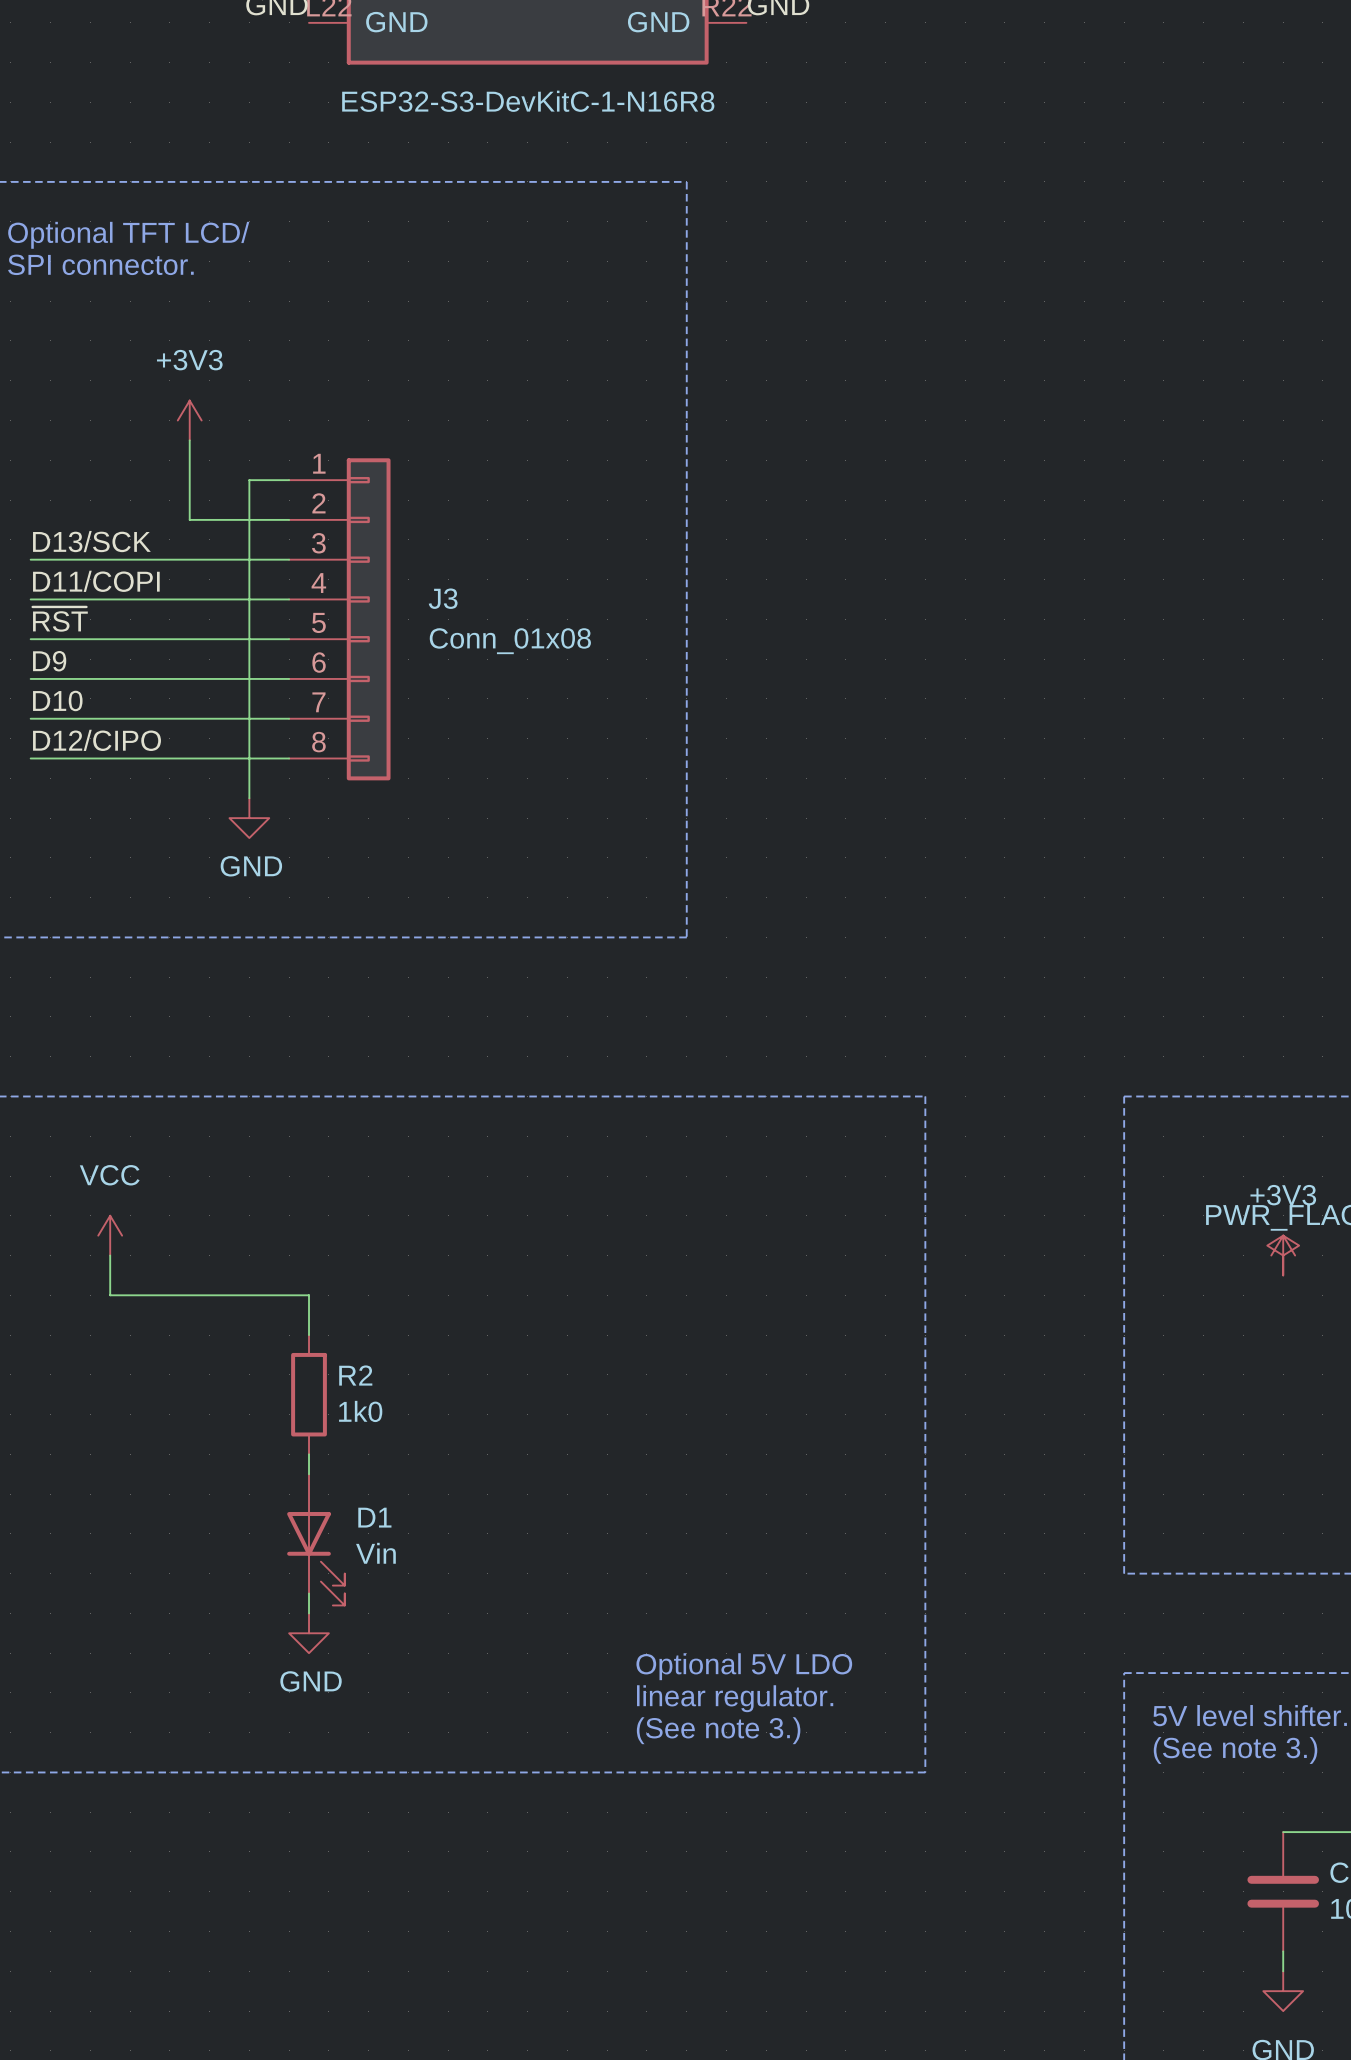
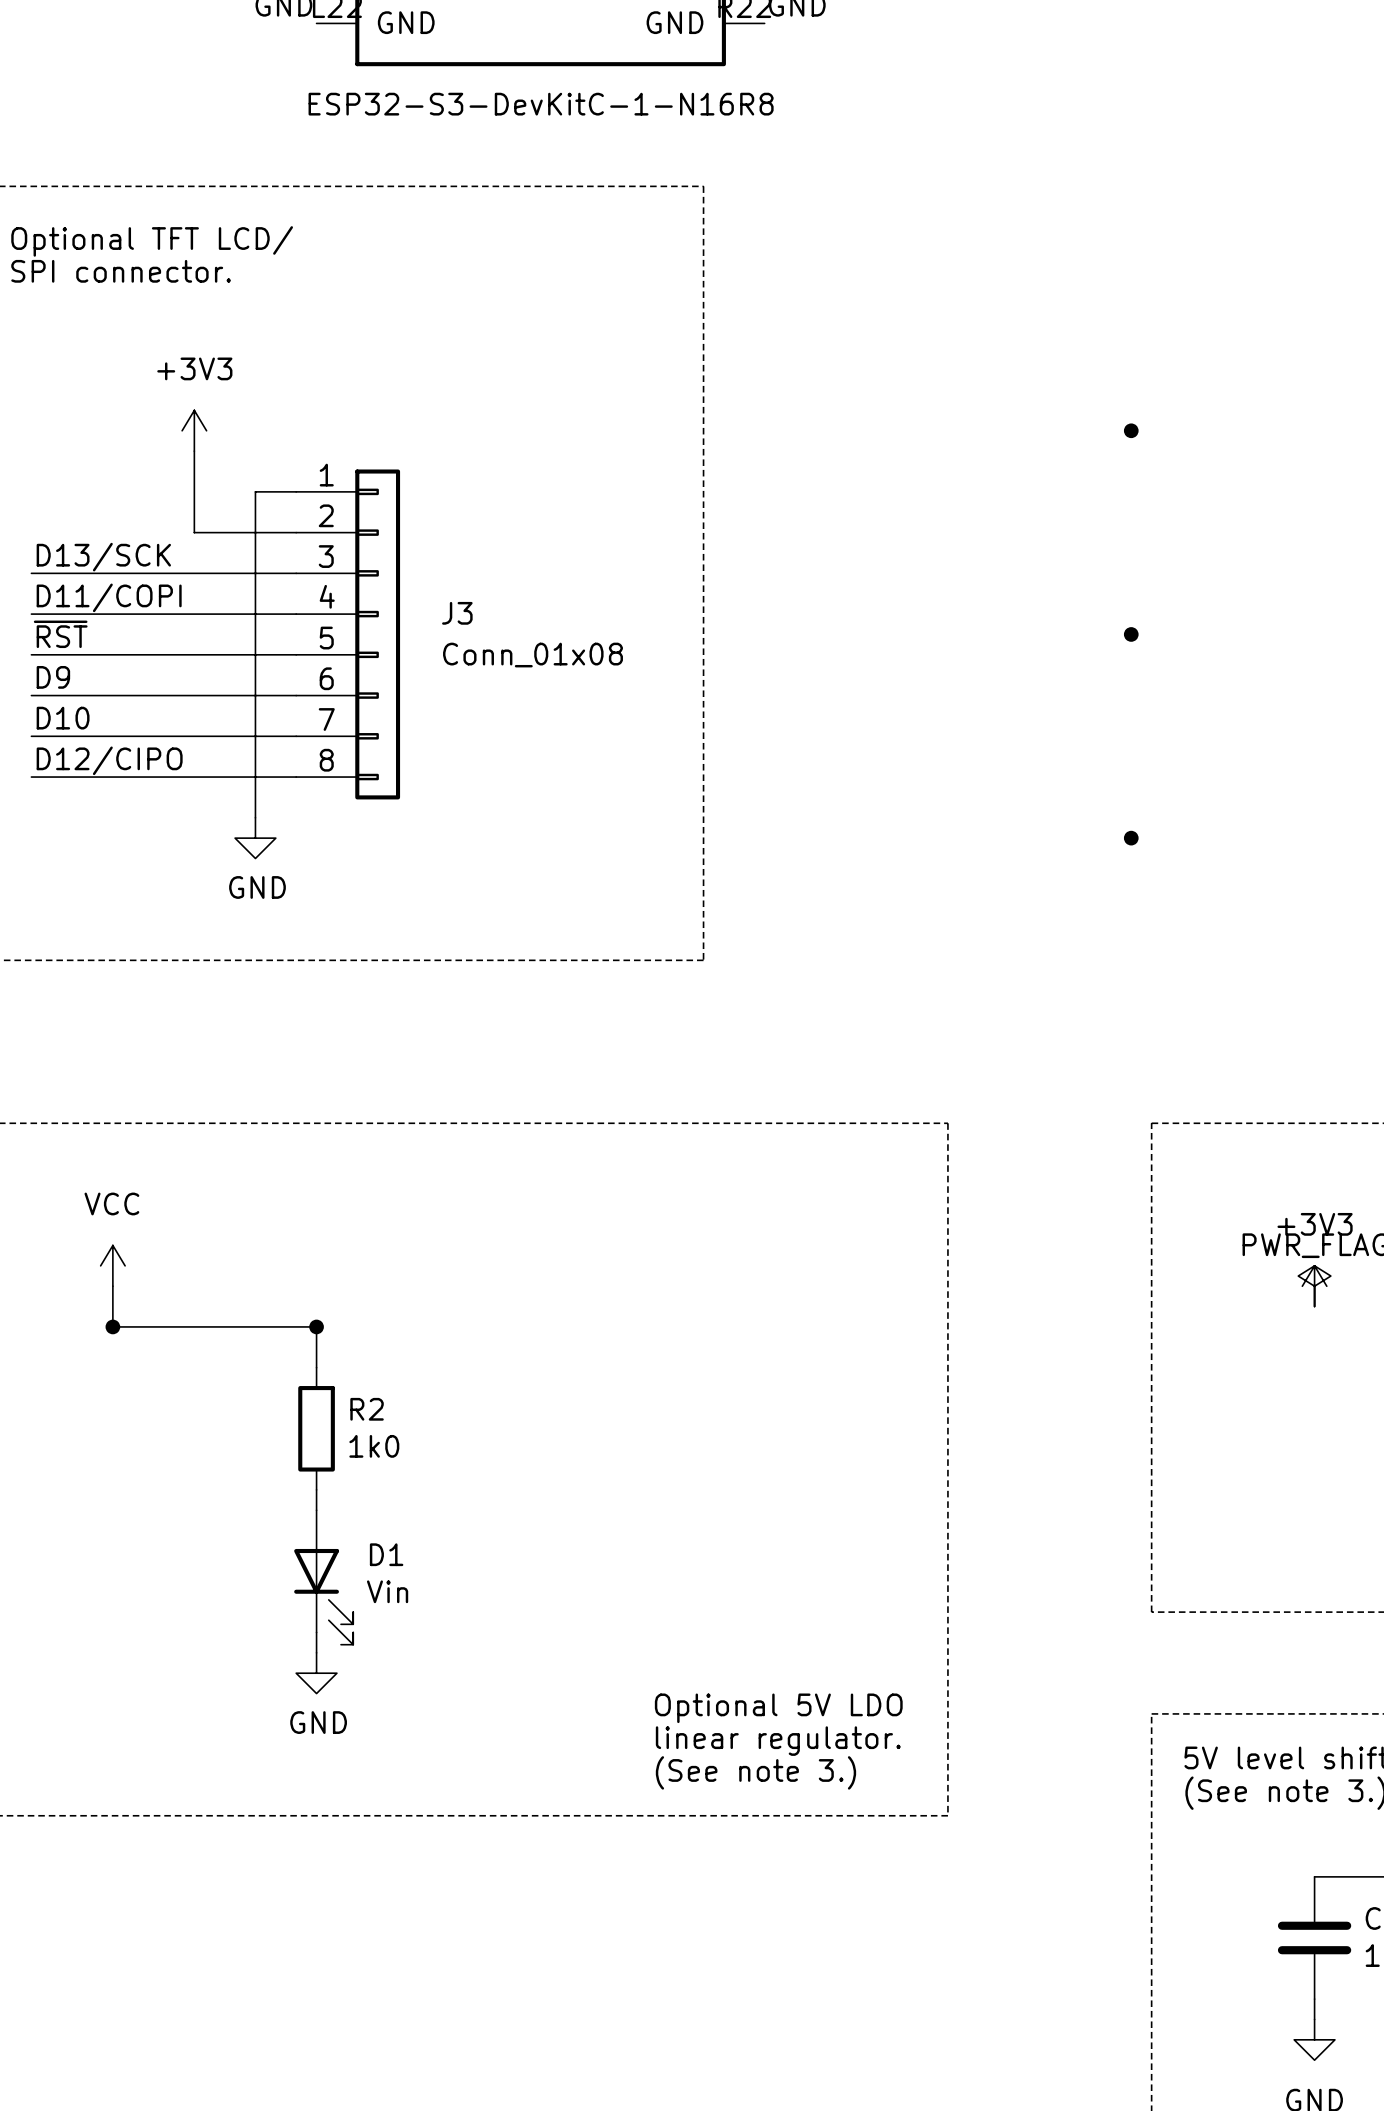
junction: none -> (1131, 430)
junction: none -> (1131, 634)
junction: none -> (1131, 838)
junction: none -> (112, 1326)
junction: none -> (316, 1326)

